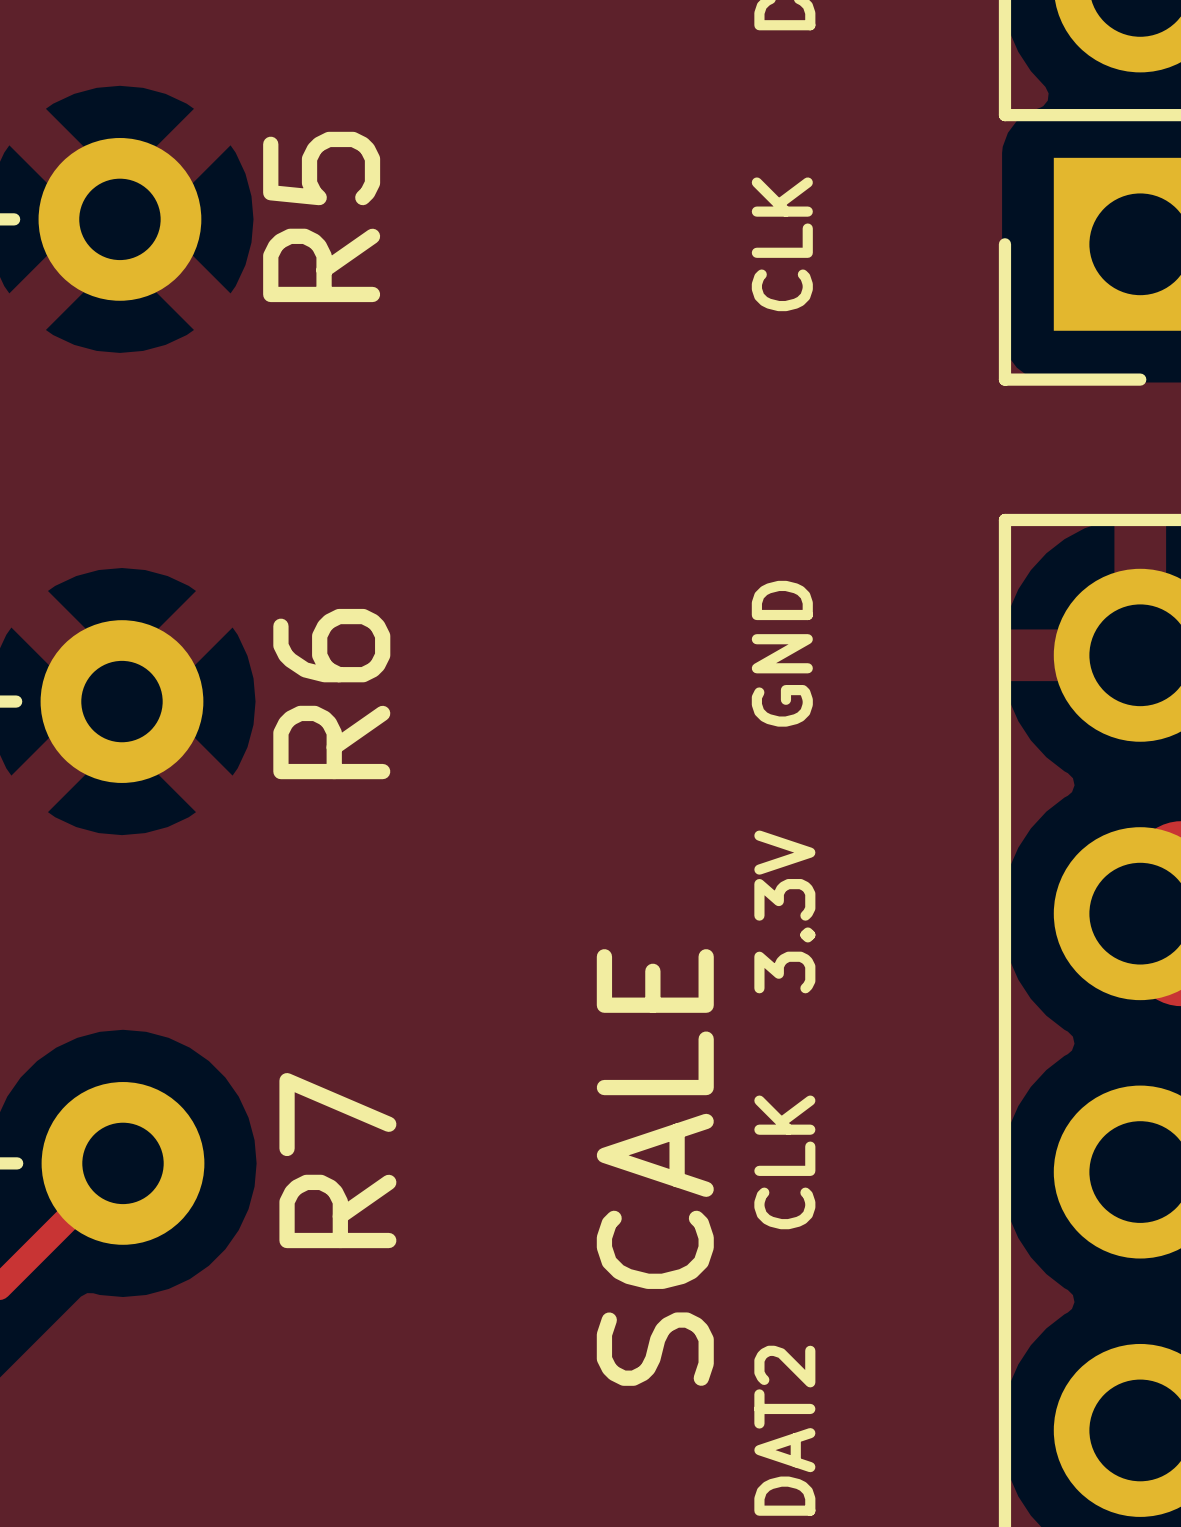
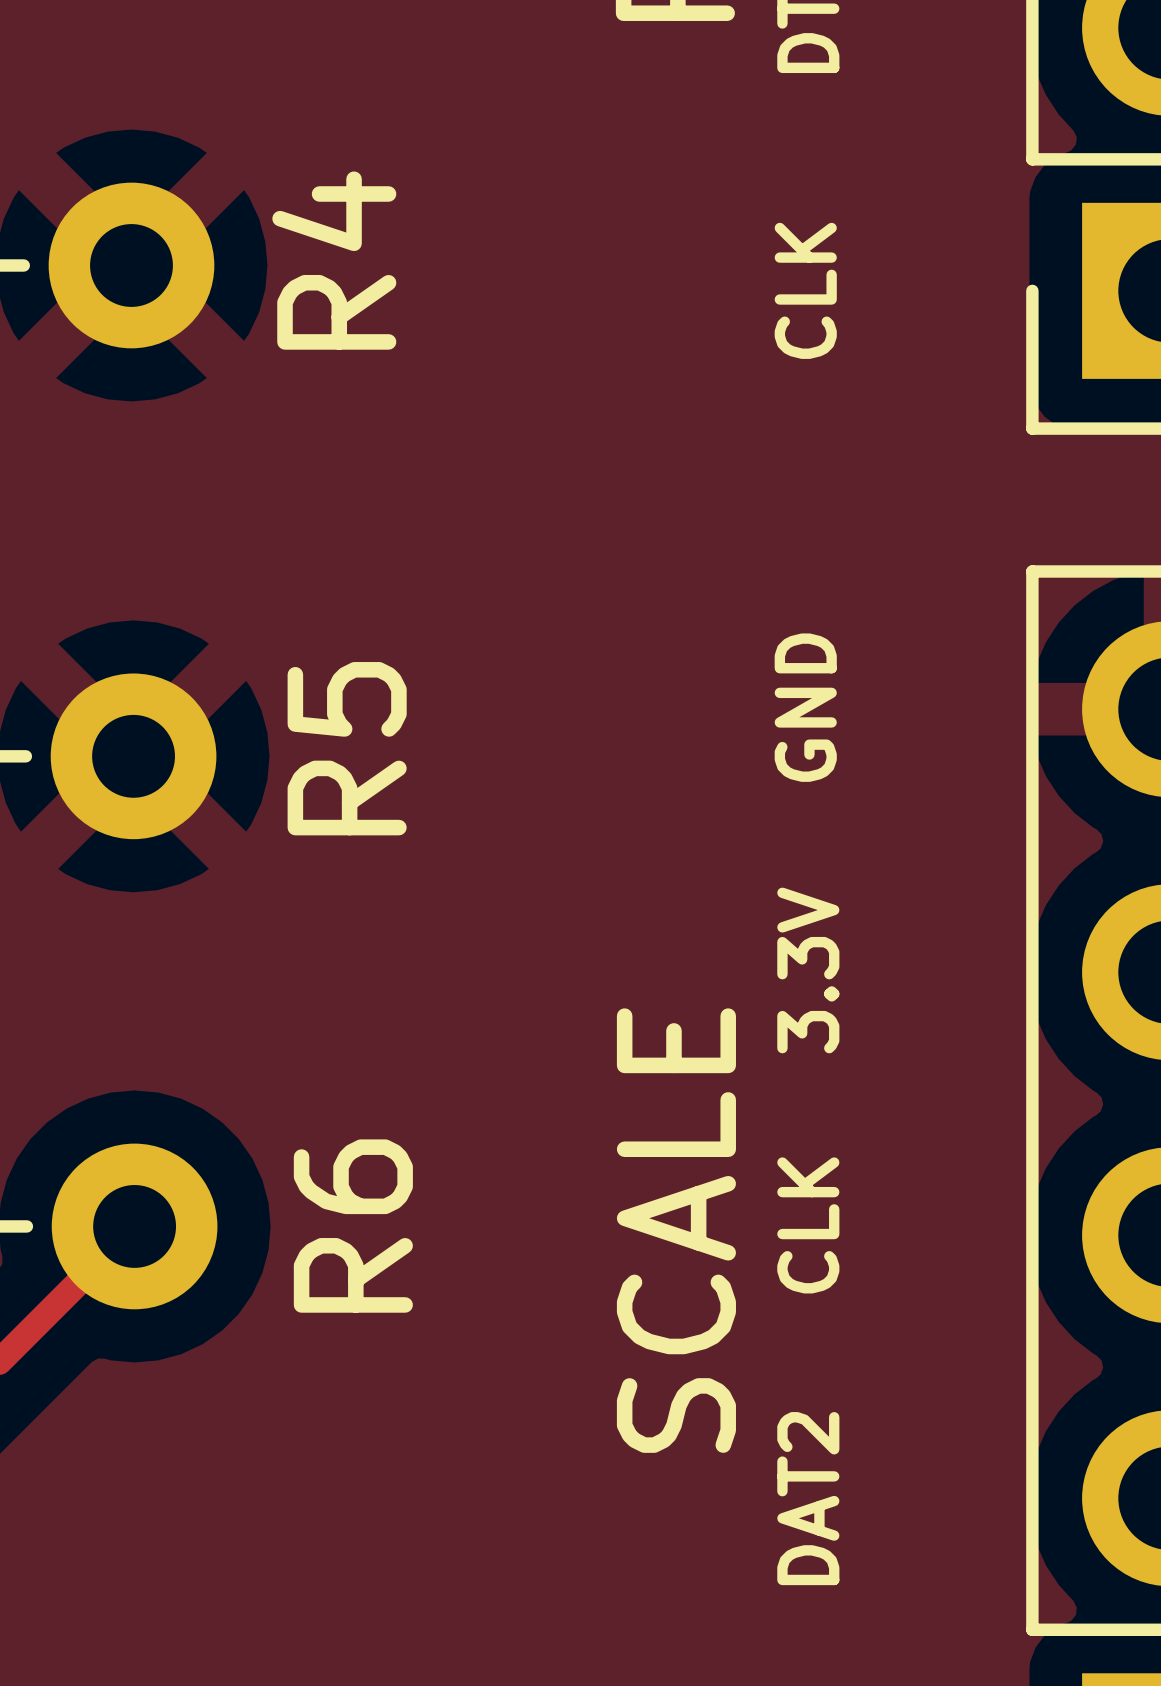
R5 name: R5 (321, 216) -> R4 (334, 260)
R6 name: R6 (331, 694) -> R5 (347, 748)
R7 name: R7 (337, 1160) -> R6 (353, 1226)

